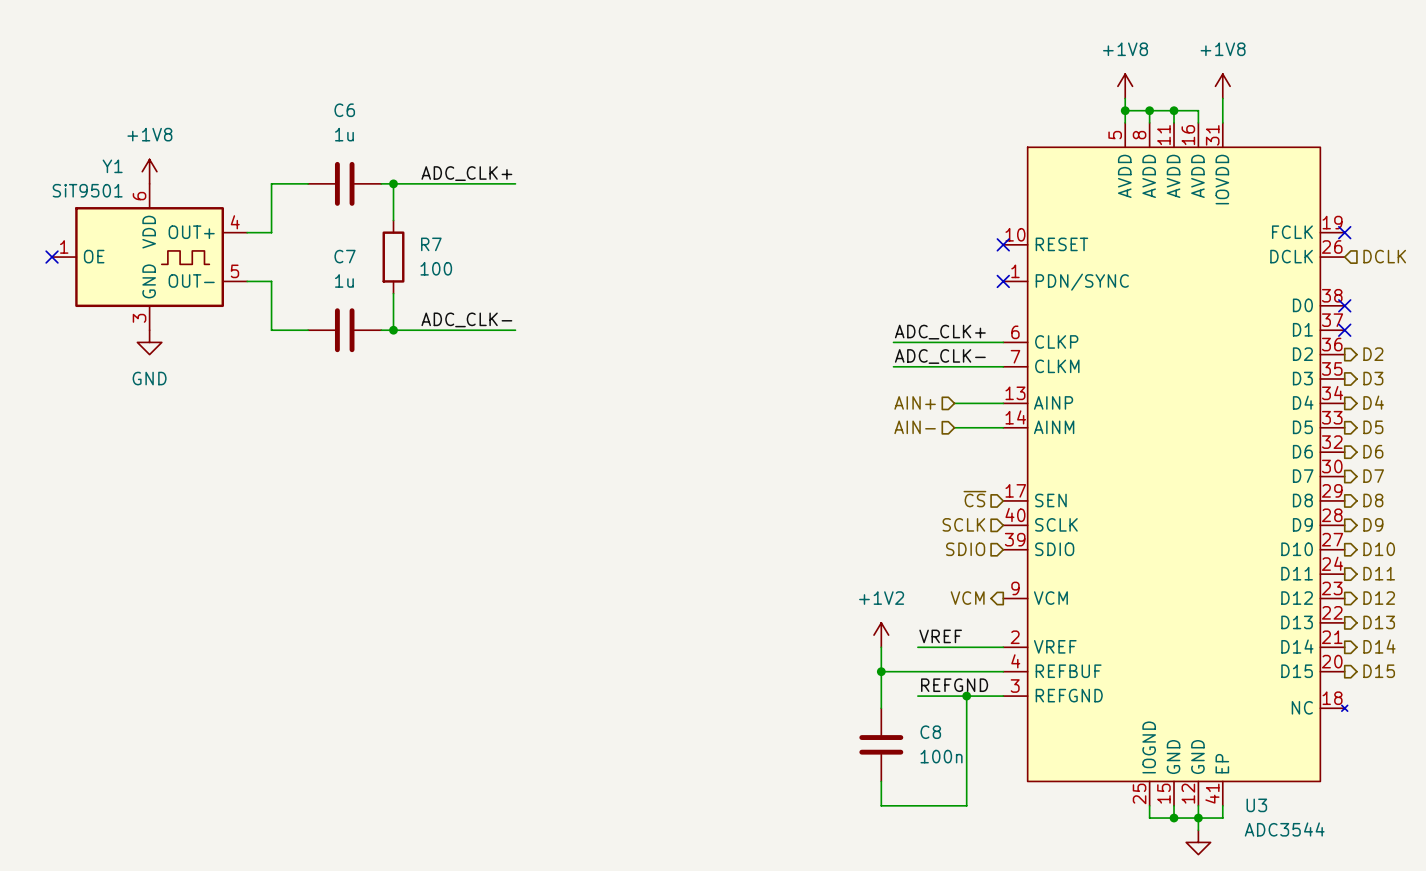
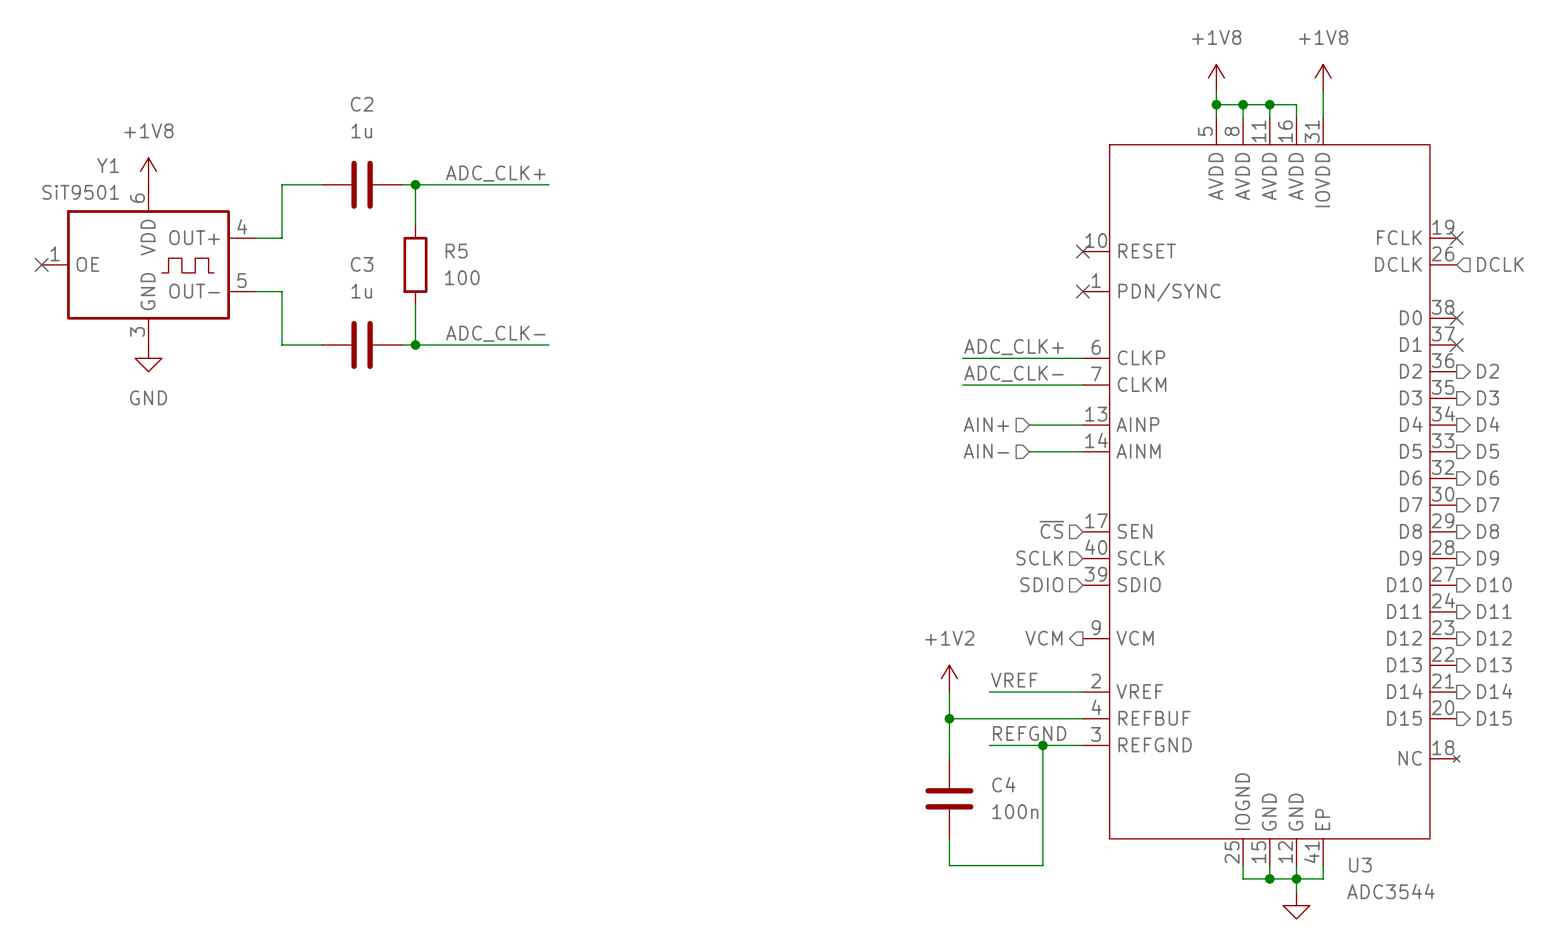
C6 name: C6 (344, 110) -> C2 (362, 104)
R7 name: R7 (431, 244) -> R5 (456, 251)
C7 name: C7 (345, 256) -> C3 (362, 264)
C8 name: C8 (930, 732) -> C4 (1003, 784)

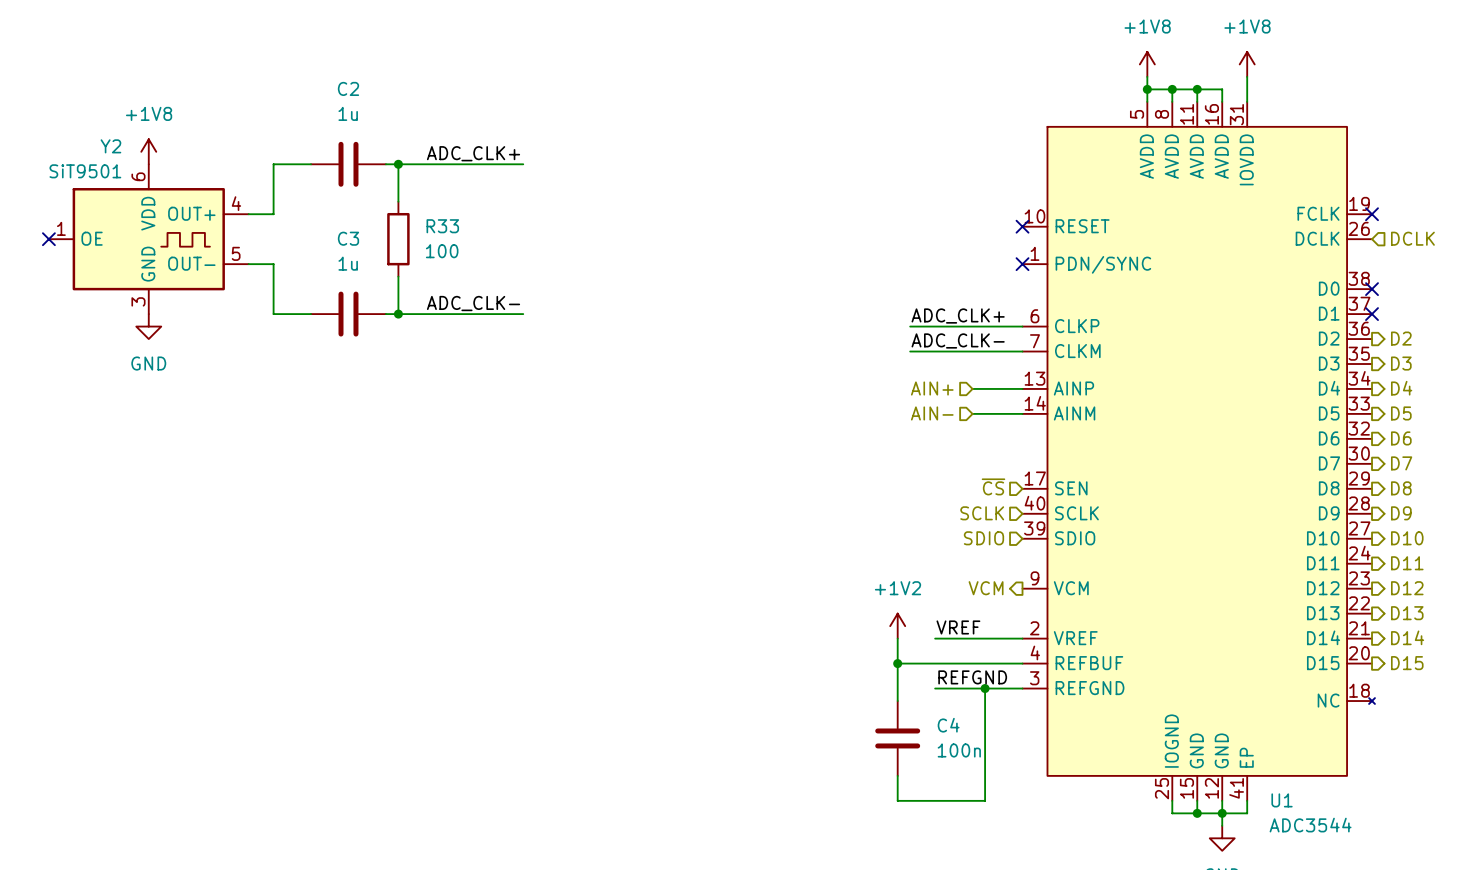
Y1 name: Y1 (108, 165) -> Y2 (110, 146)
R5 name: R5 (456, 251) -> R33 (442, 226)
U3 name: U3 (1360, 865) -> U1 (1282, 800)

